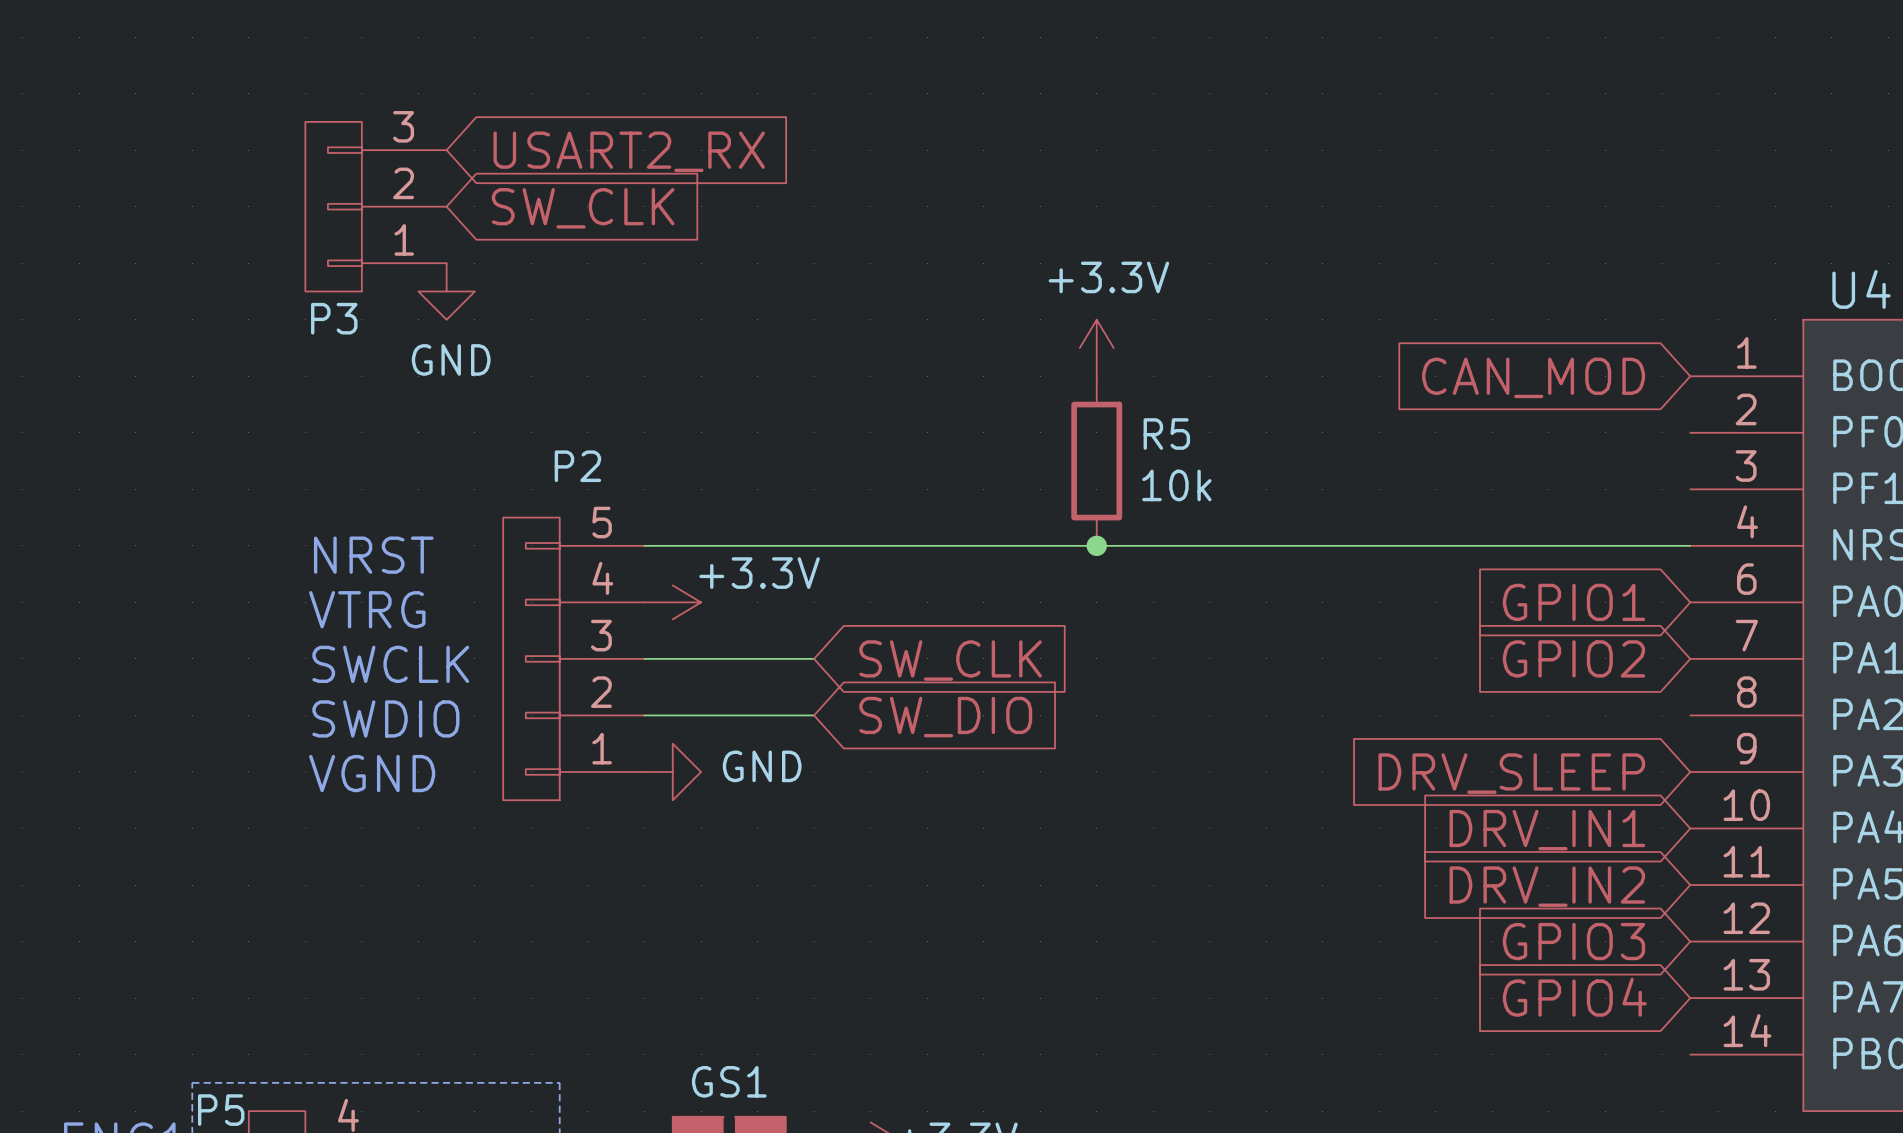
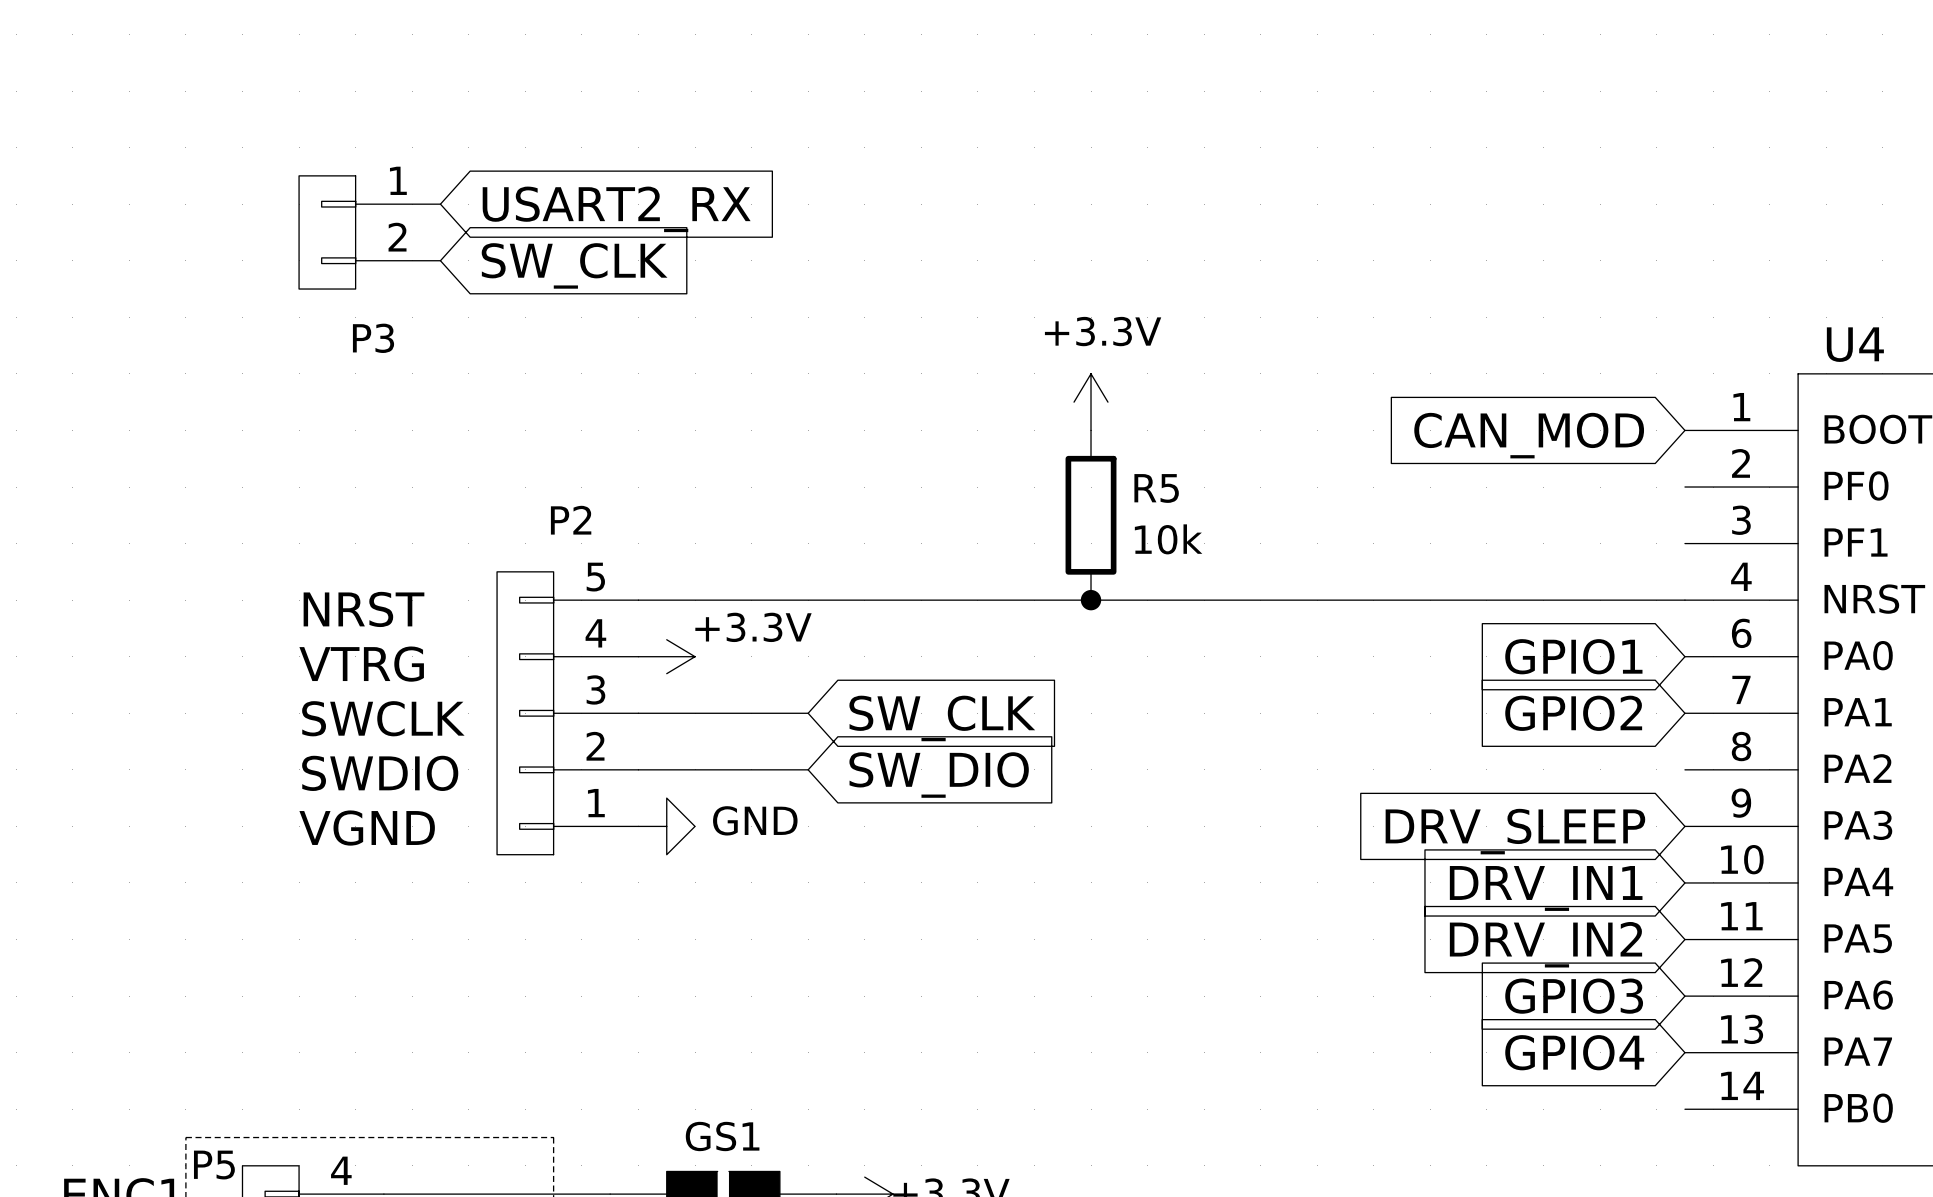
P3 symbol: [305, 121, 447, 292] -> [299, 175, 441, 290]
power symbol: GND (446, 291) -> none
P3 name position: P3 (334, 318) -> P3 (373, 338)

